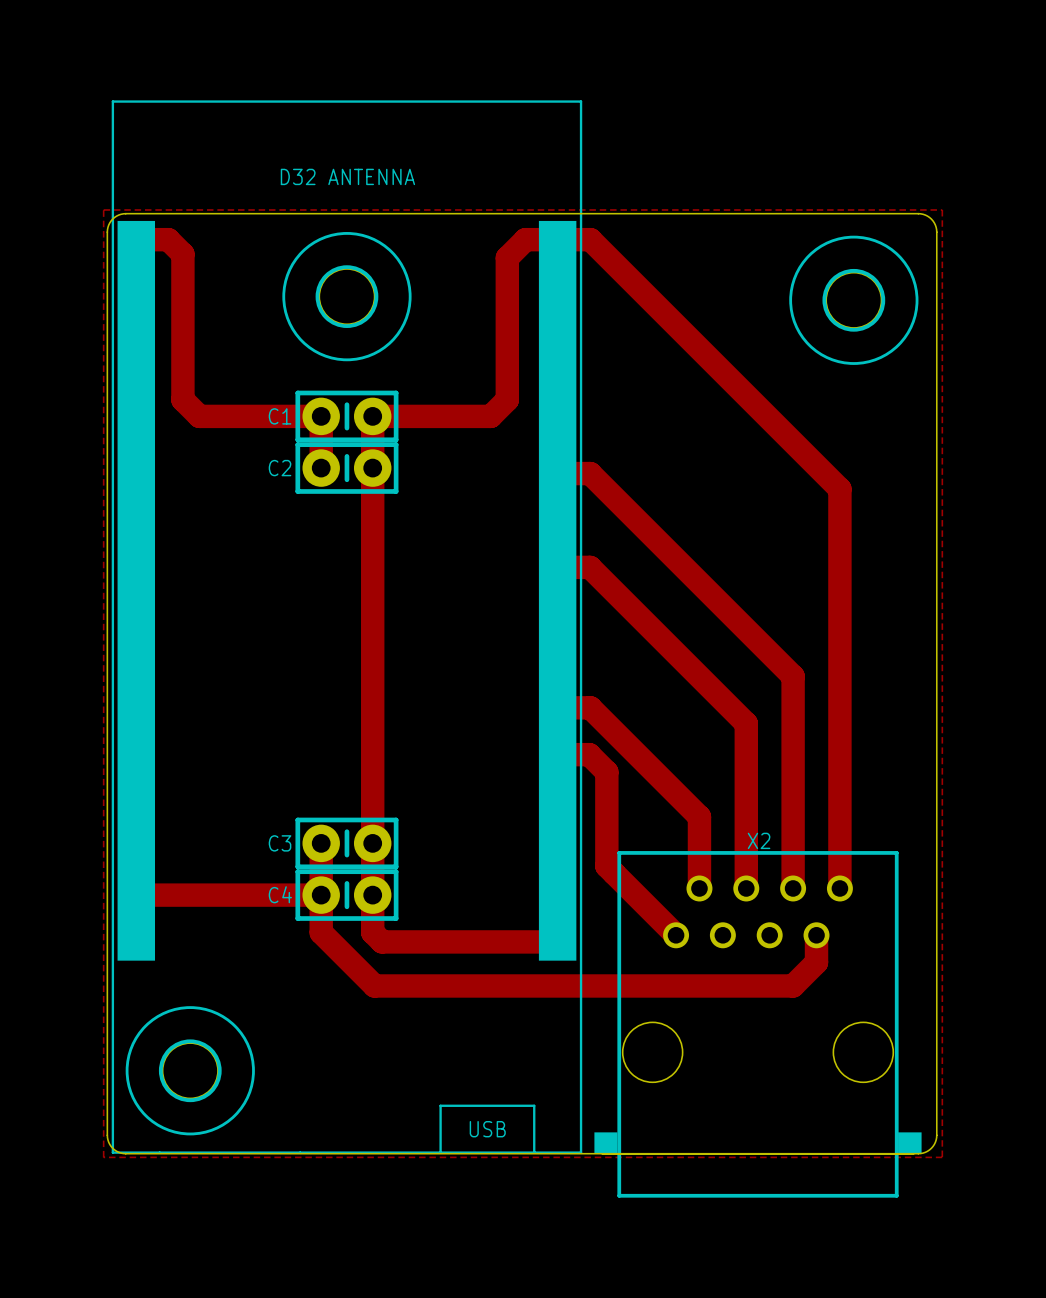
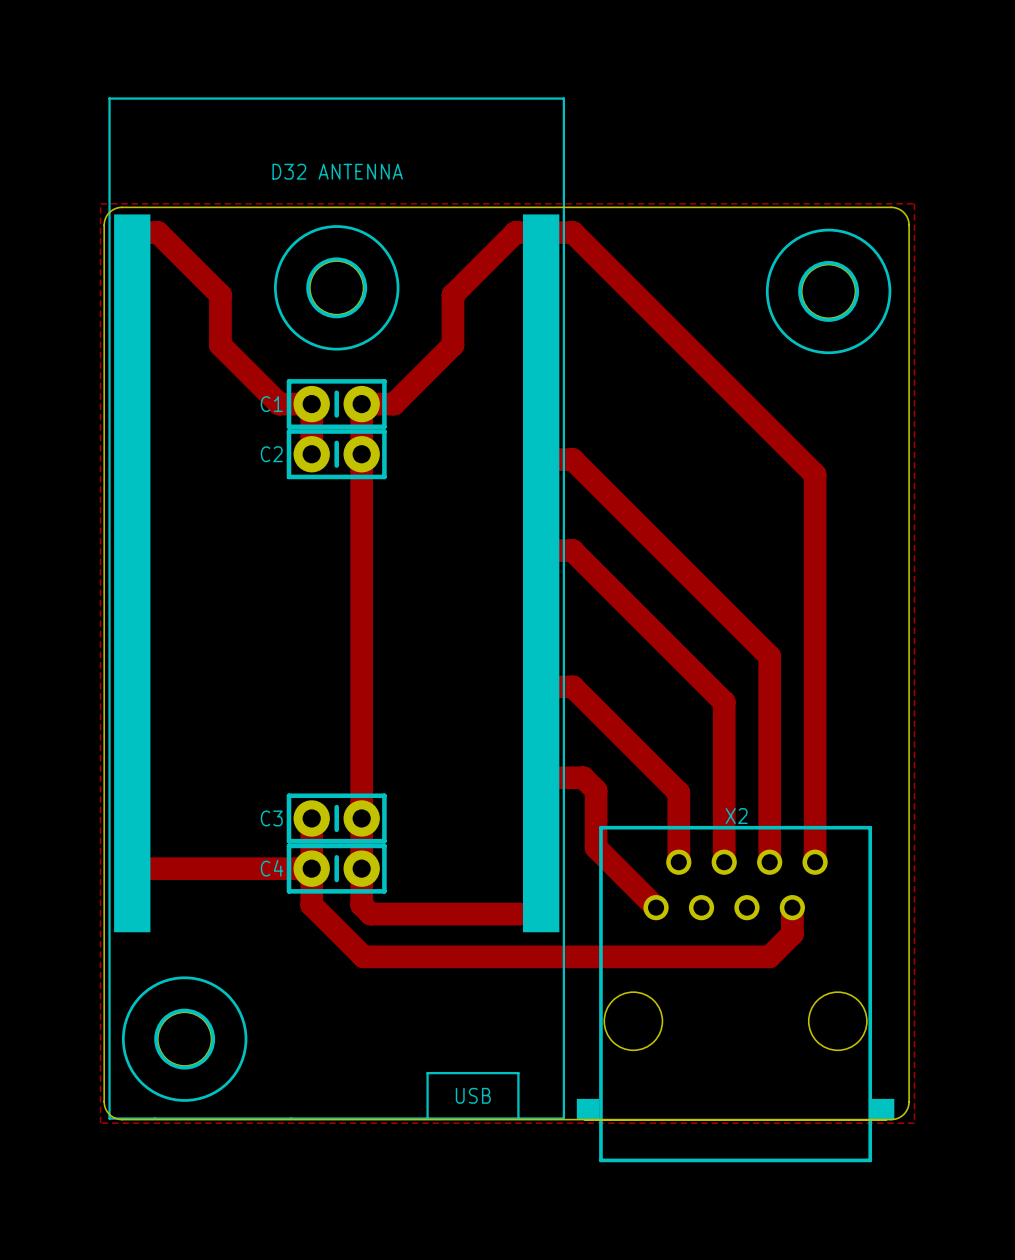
track: (162, 239) (168, 239) (182, 254) (182, 399) (199, 416) (287, 416) -> (158, 232) (220, 295) (220, 345) (279, 404)
track: (531, 239) (525, 239) (507, 257) (507, 399) (490, 416) (405, 416) -> (515, 232) (452, 295) (452, 345) (393, 404)
track: (557, 754) (589, 754) (606, 772) (606, 866) (614, 873) -> (541, 777) (583, 777) (596, 790) (596, 847)

